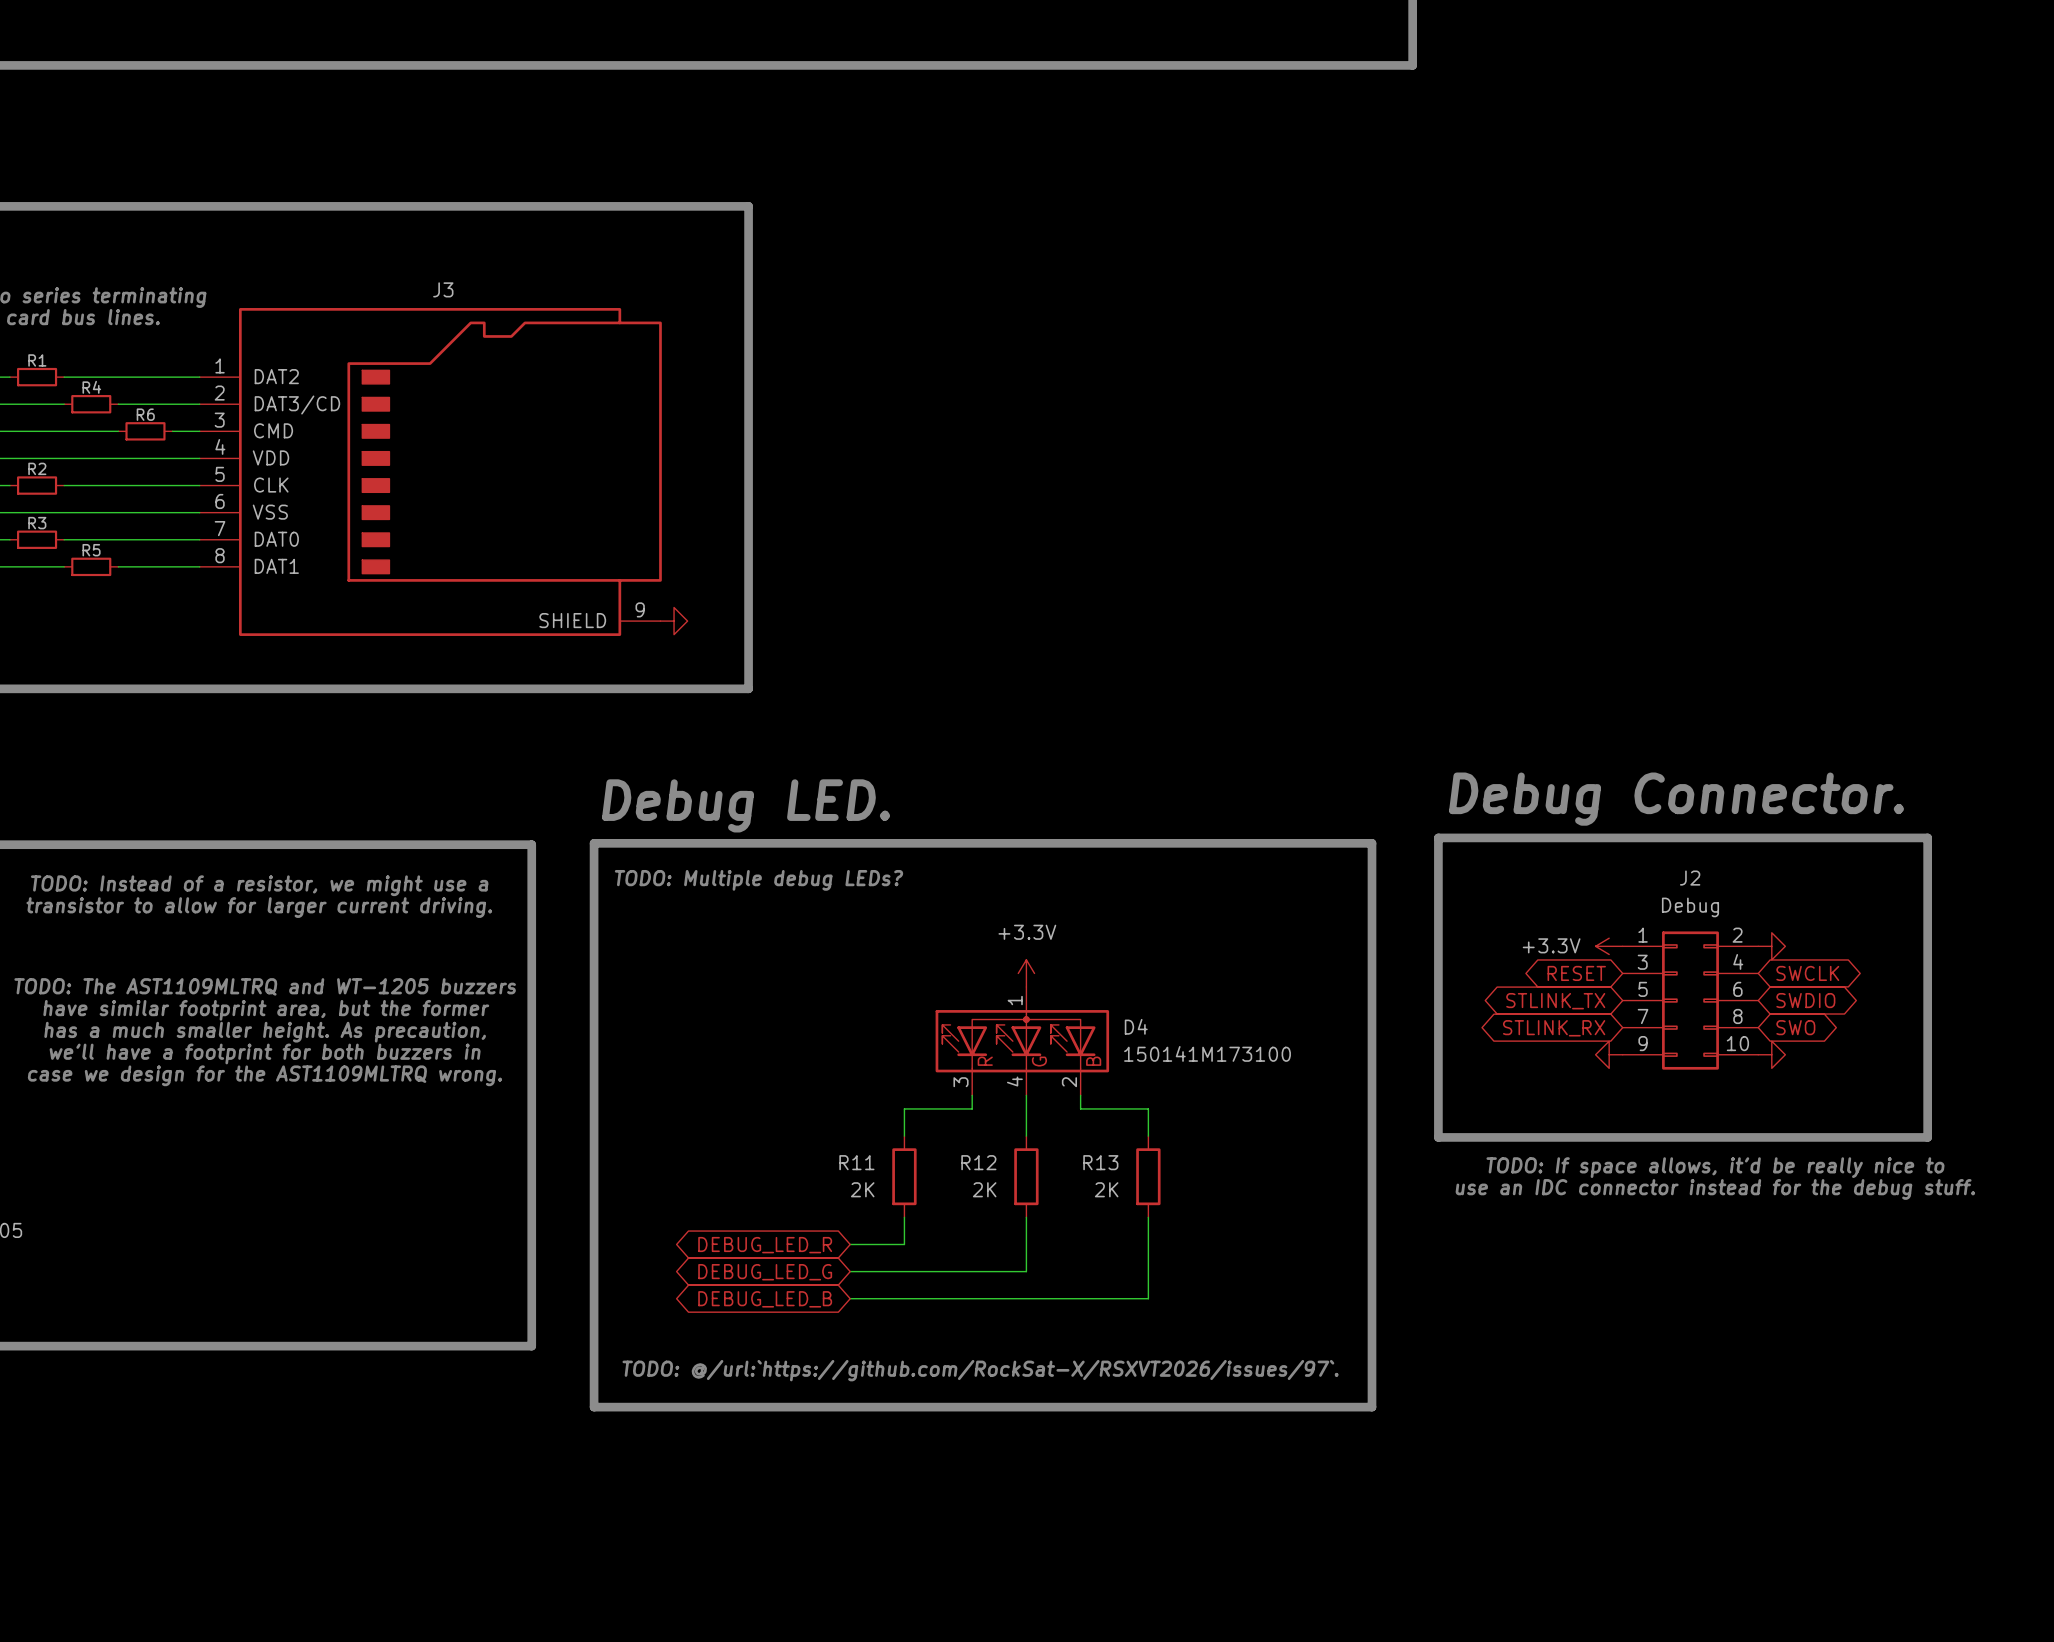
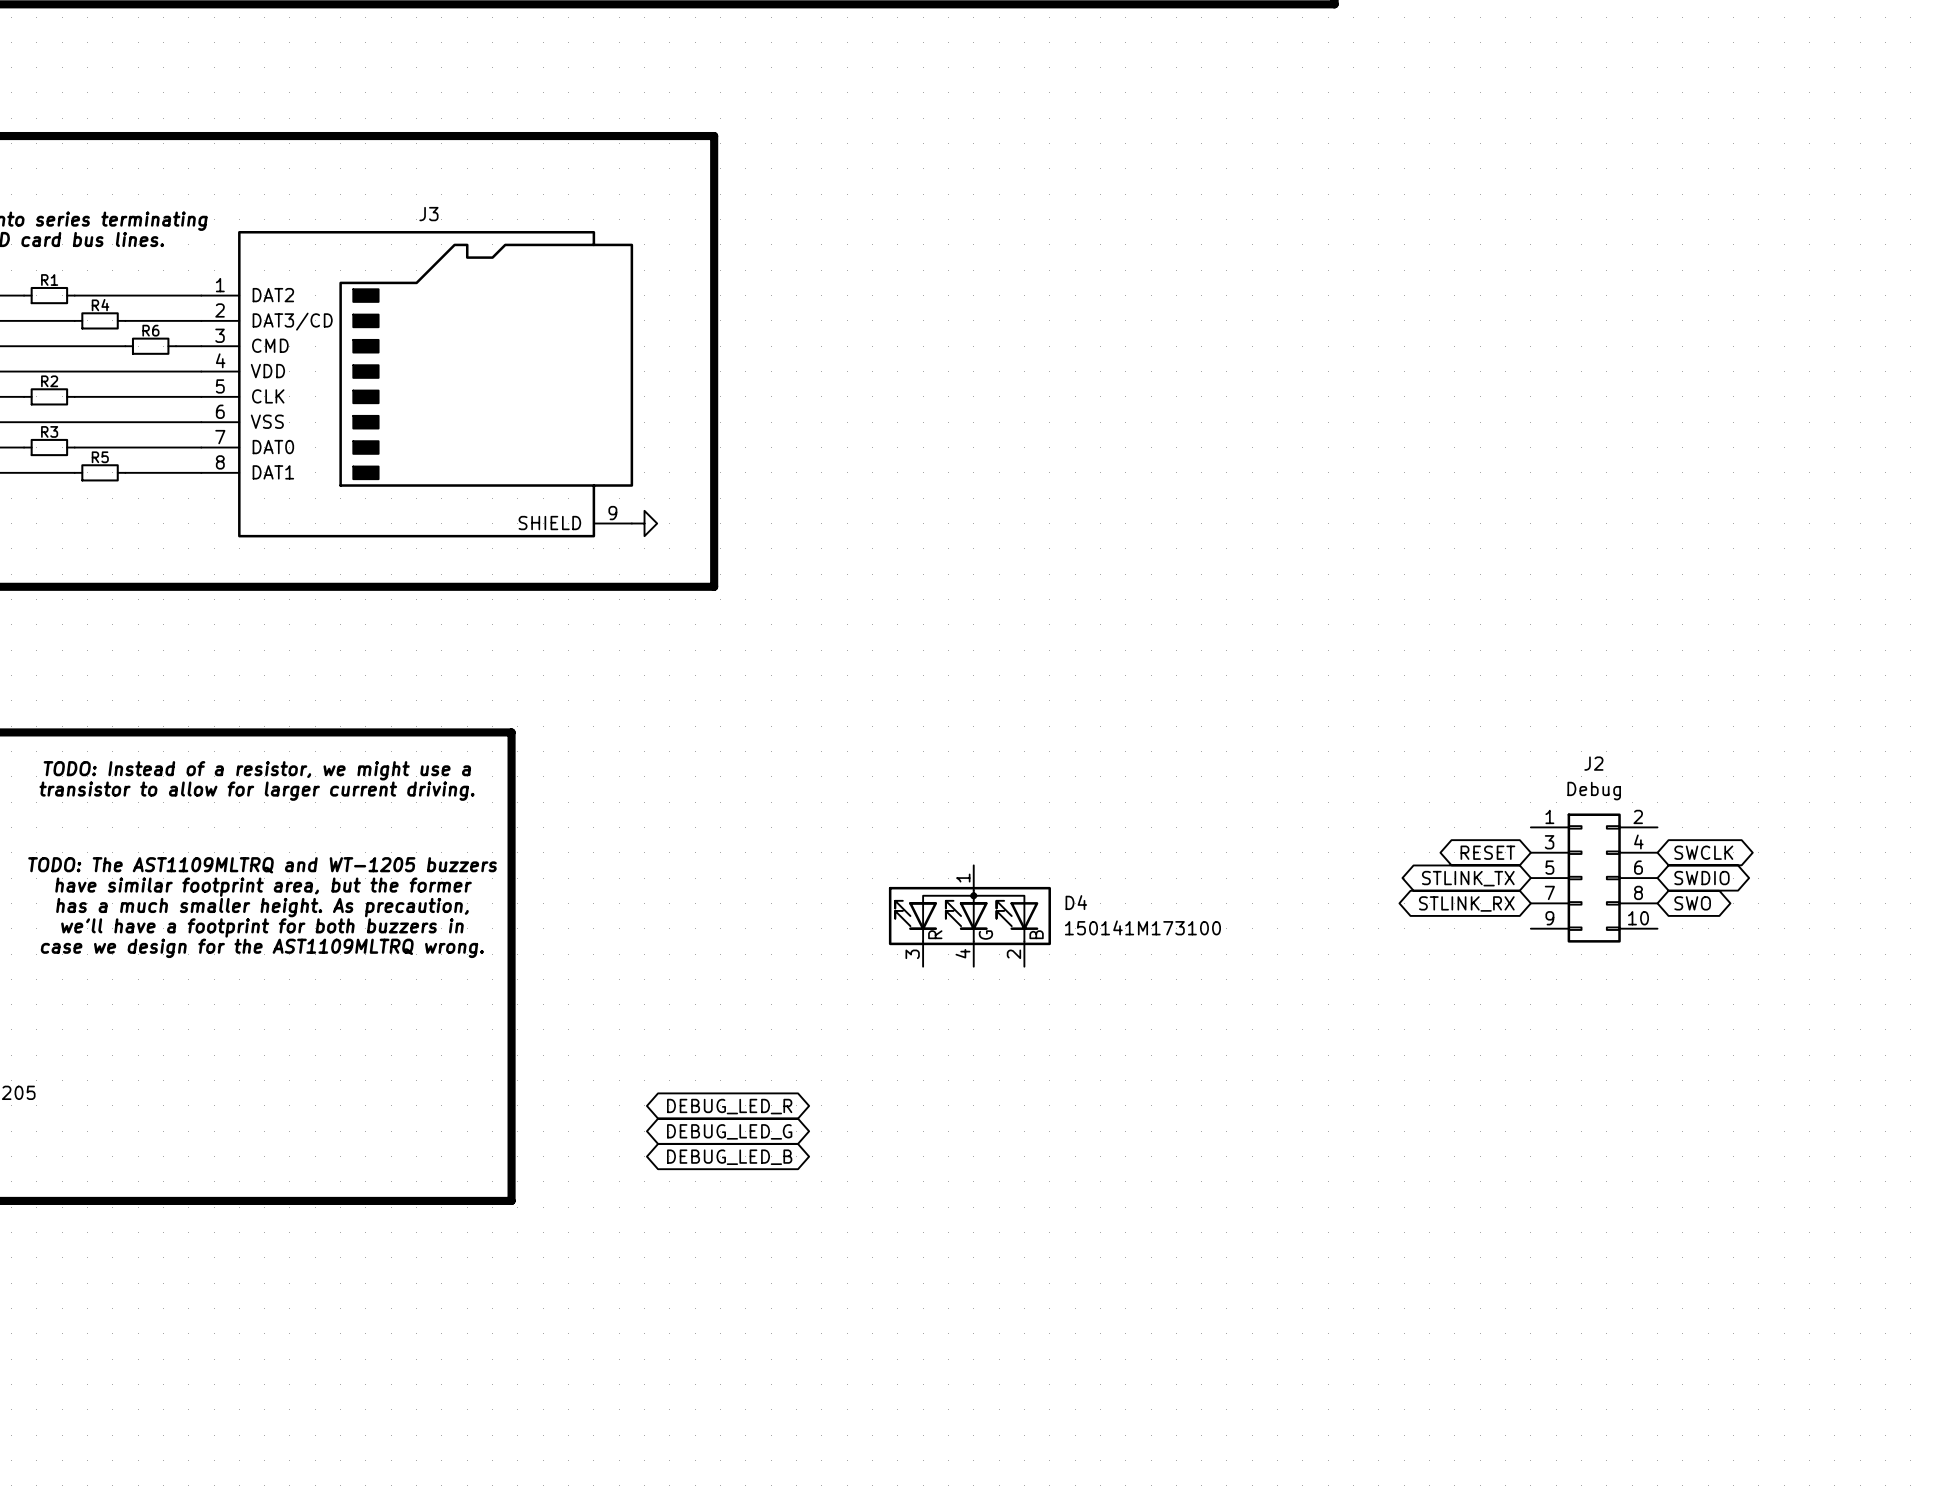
text: Debug Connector. (1676, 799) -> none
text: Debug LED. (746, 805) -> none
line: (1438, 837) (1927, 837) (1927, 1137) (1438, 1137) (1438, 837) -> none
line: (594, 843) (1372, 843) (1372, 1407) (594, 1407) (594, 843) -> none
text: TODO: Multiple debug LEDs? (758, 880) -> none
power symbol: +3.3V (1609, 946) -> none
power symbol: (1771, 946) -> none
power symbol: +3.3V (1026, 973) -> none
power symbol: (1609, 1054) -> none
power symbol: (1771, 1054) -> none
wire: (972, 1095) (972, 1108) (904, 1108) (904, 1136) -> none
wire: (1026, 1095) (1026, 1136) -> none
wire: (1080, 1095) (1080, 1108) (1148, 1108) (1148, 1136) -> none
text: TODO: If space allows, it'd be really nice to (1715, 1167) -> none
R11: 2K (904, 1176) -> none
R12: 2K (1026, 1176) -> none
R13: 2K (1148, 1176) -> none
text: use an IDC connector instead for the debug stuff. (1715, 1189) -> none
wire: (904, 1217) (904, 1244) (850, 1244) -> none
wire: (1026, 1217) (1026, 1271) (850, 1271) -> none
wire: (1148, 1217) (1148, 1298) (850, 1298) -> none
text: TODO: @/url:`https://github.com/RockSat-X/RSXVT2026/issues/97`. (980, 1370) -> none

